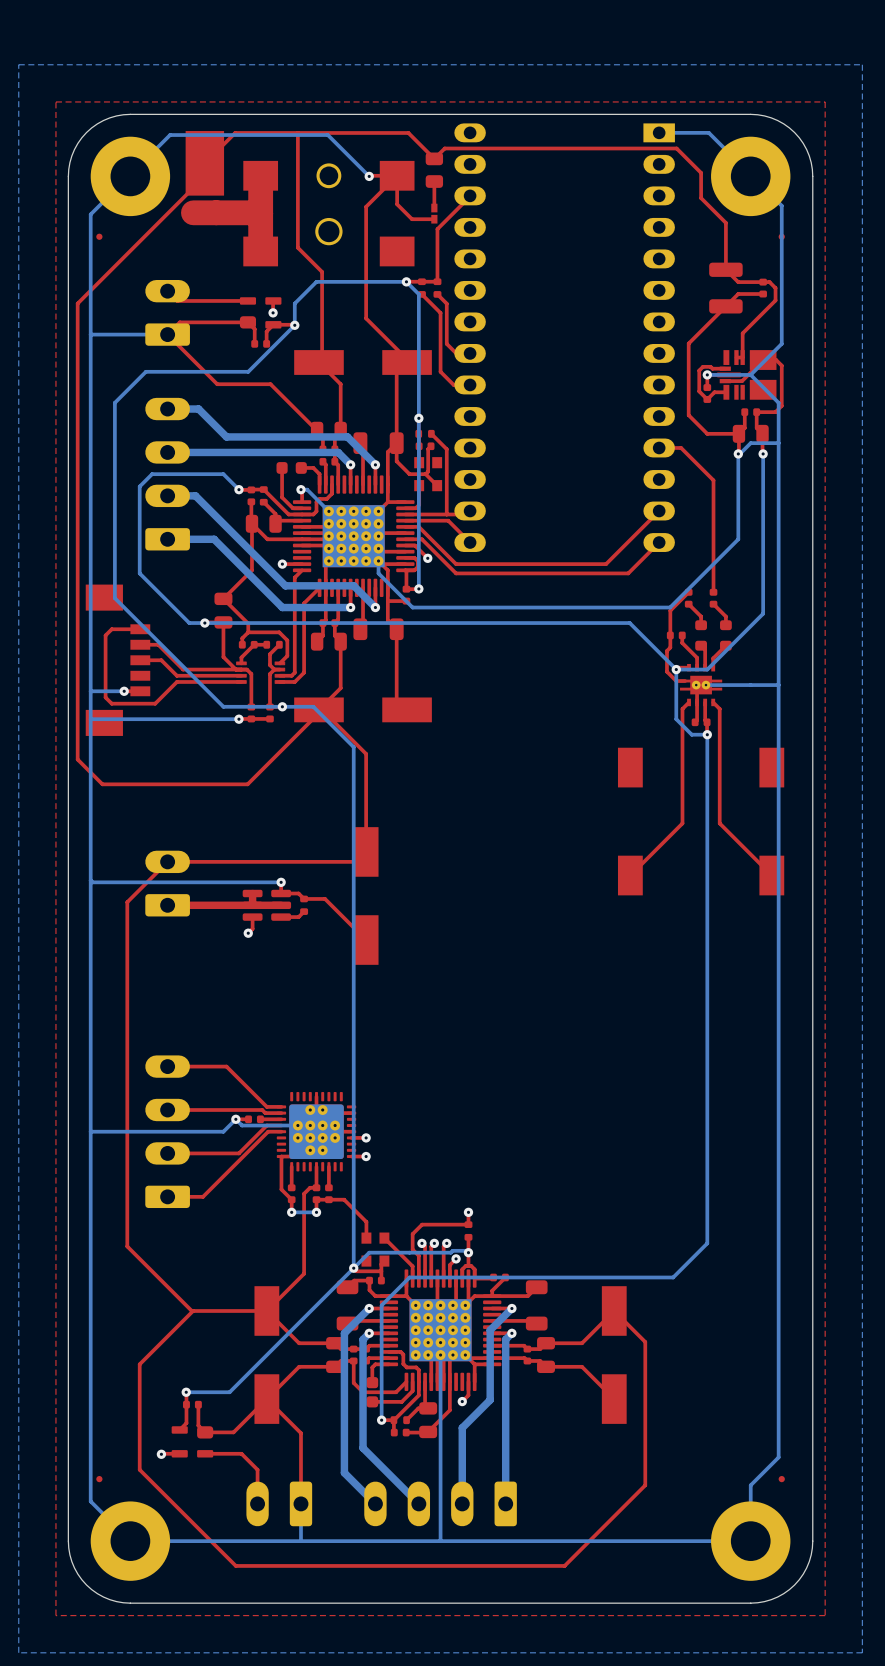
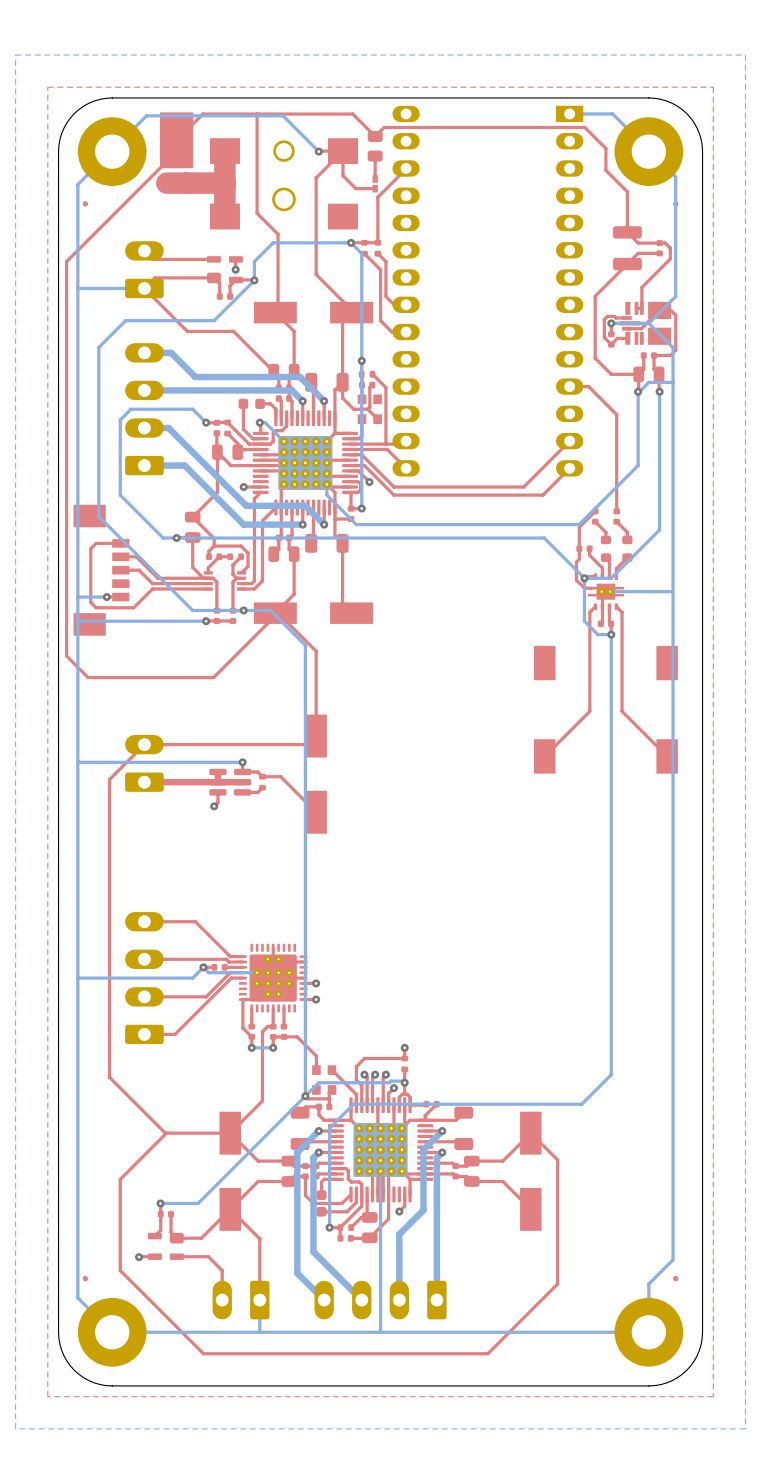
part footprint: [276, 1092, 357, 1172] -> [238, 943, 308, 1013]

